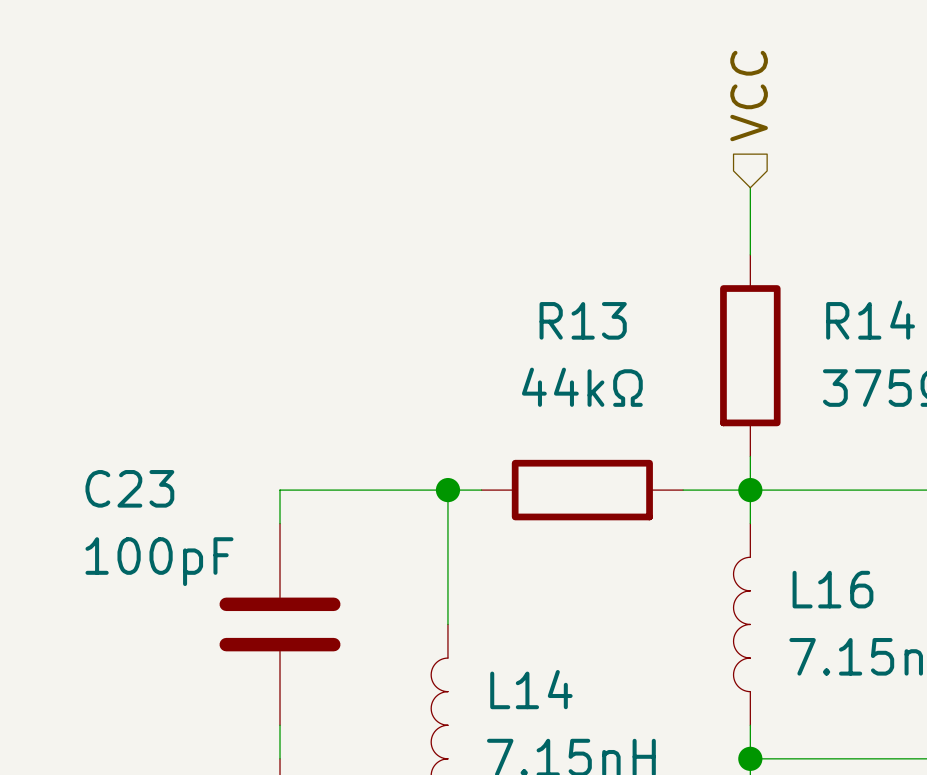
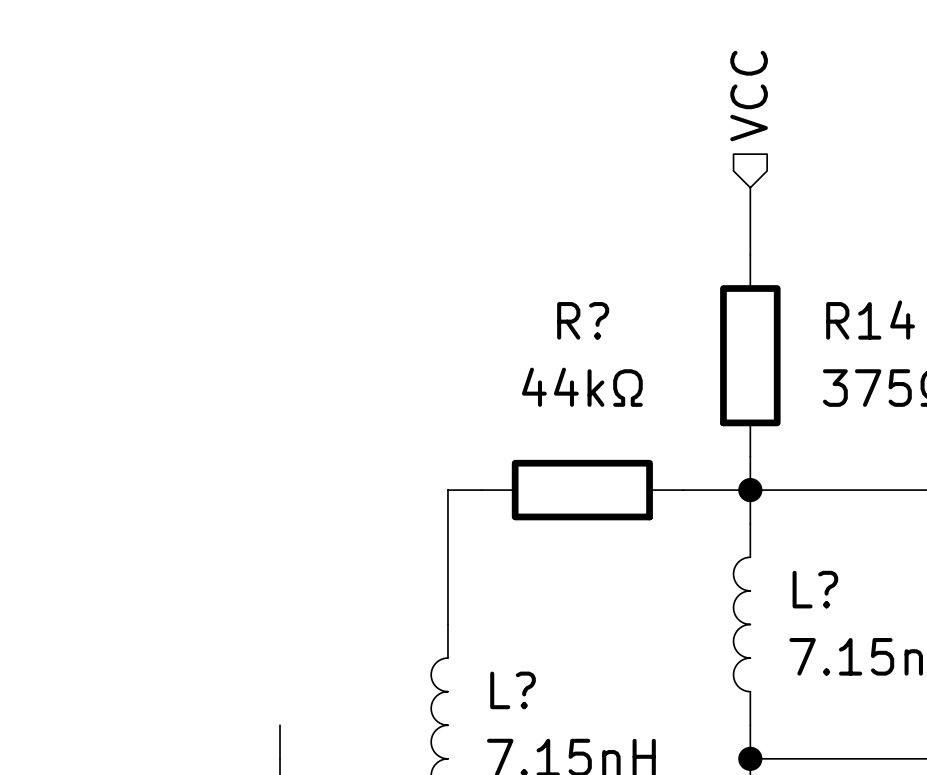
R13 name: R13 (583, 320) -> R? (583, 320)
wire: (447, 490) (280, 490) (280, 523) -> none
junction: (447, 490) -> none
L16 name: L16 (832, 589) -> L? (815, 589)
C23: 100pF (280, 624) -> none
L14 name: L14 (531, 689) -> L? (513, 690)

